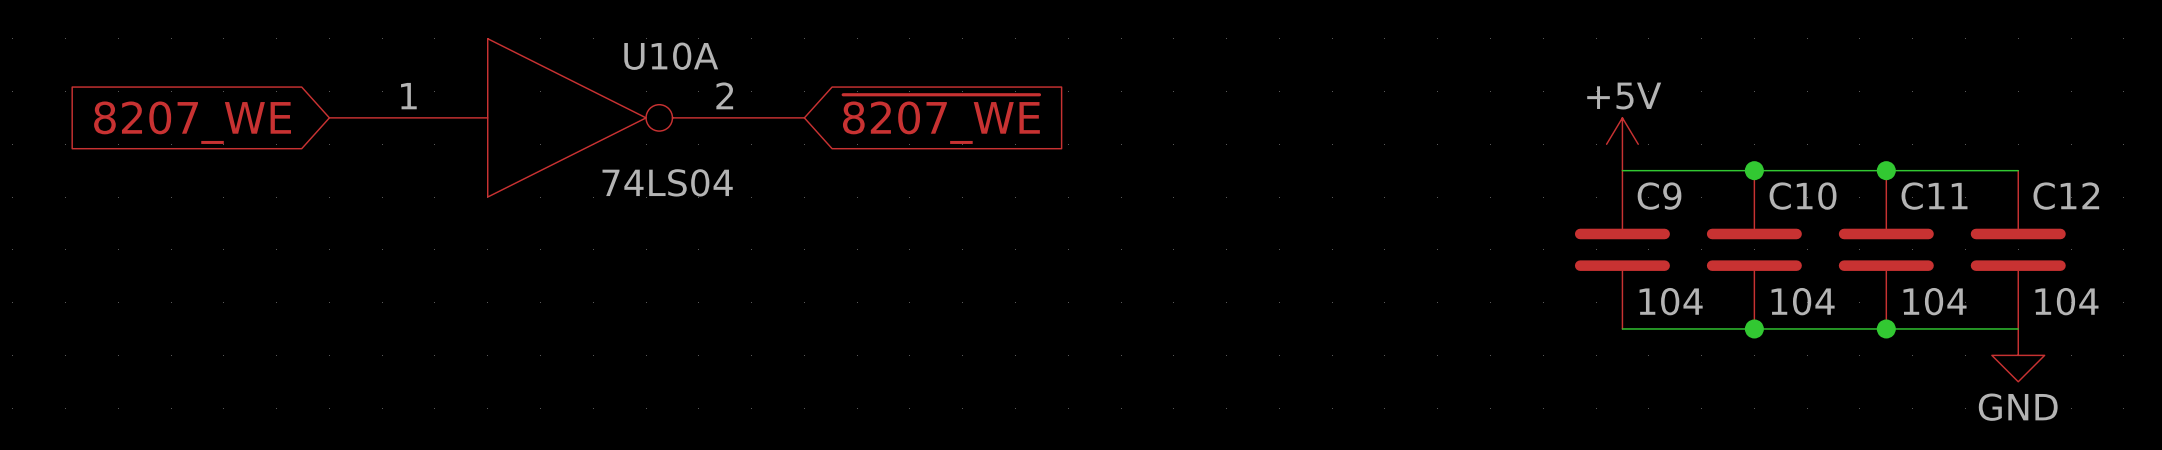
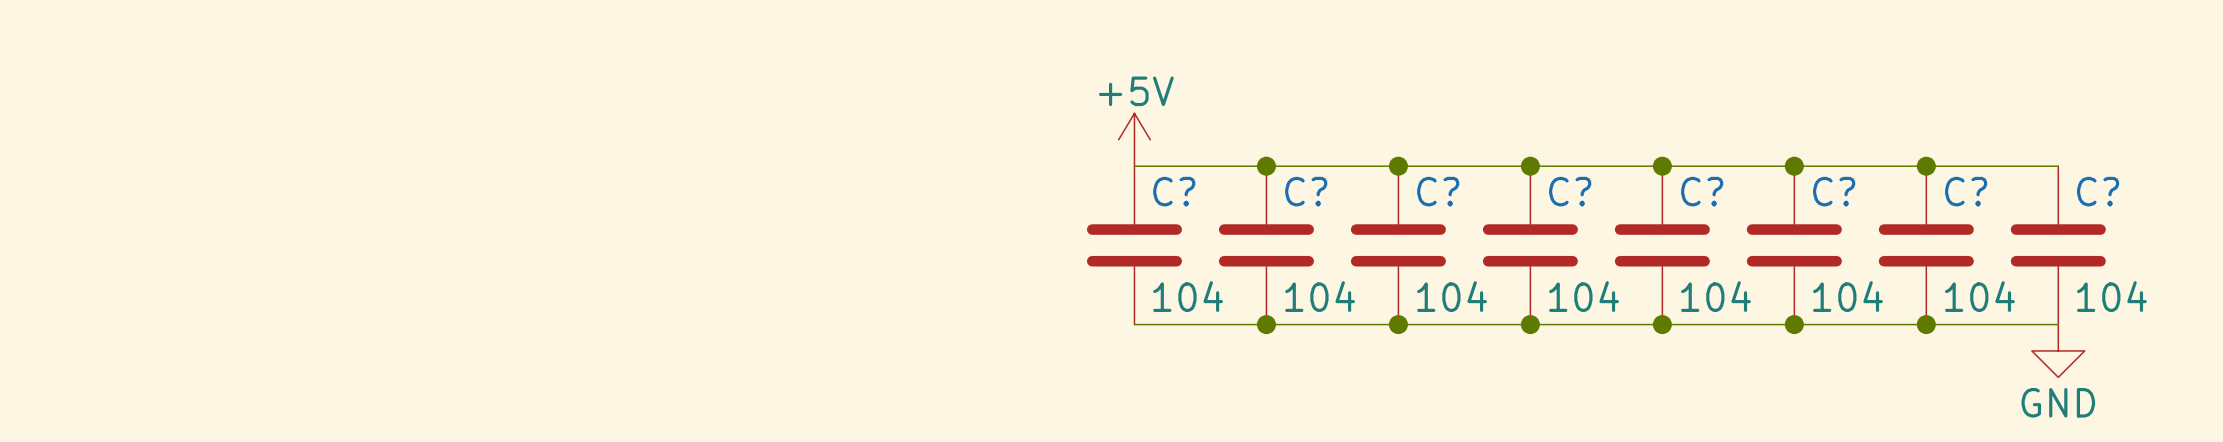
U10A: 74LS04 (566, 117) -> none
global label: ~{8207_WE} (941, 119) -> none
global label: 8207_WE (192, 122) -> none
power symbol: none -> +5V (1134, 139)
power symbol: +5V (1622, 144) -> none
wire: none -> (1134, 166) (1662, 166)
junction: none -> (1266, 166)
junction: none -> (1398, 166)
junction: none -> (1530, 166)
junction: none -> (1662, 166)
C9 name: C9 (1659, 196) -> C? (1702, 191)
C10 name: C10 (1803, 196) -> C? (1834, 191)
C11 name: C11 (1934, 196) -> C? (1966, 191)
C12 name: C12 (2066, 196) -> C? (2098, 191)
C?: none -> 104 (1134, 245)
C?: none -> 104 (1266, 245)
C?: none -> 104 (1398, 245)
C?: none -> 104 (1530, 245)
wire: none -> (1134, 324) (1662, 324)
junction: none -> (1266, 324)
junction: none -> (1398, 324)
junction: none -> (1530, 324)
junction: none -> (1662, 324)

